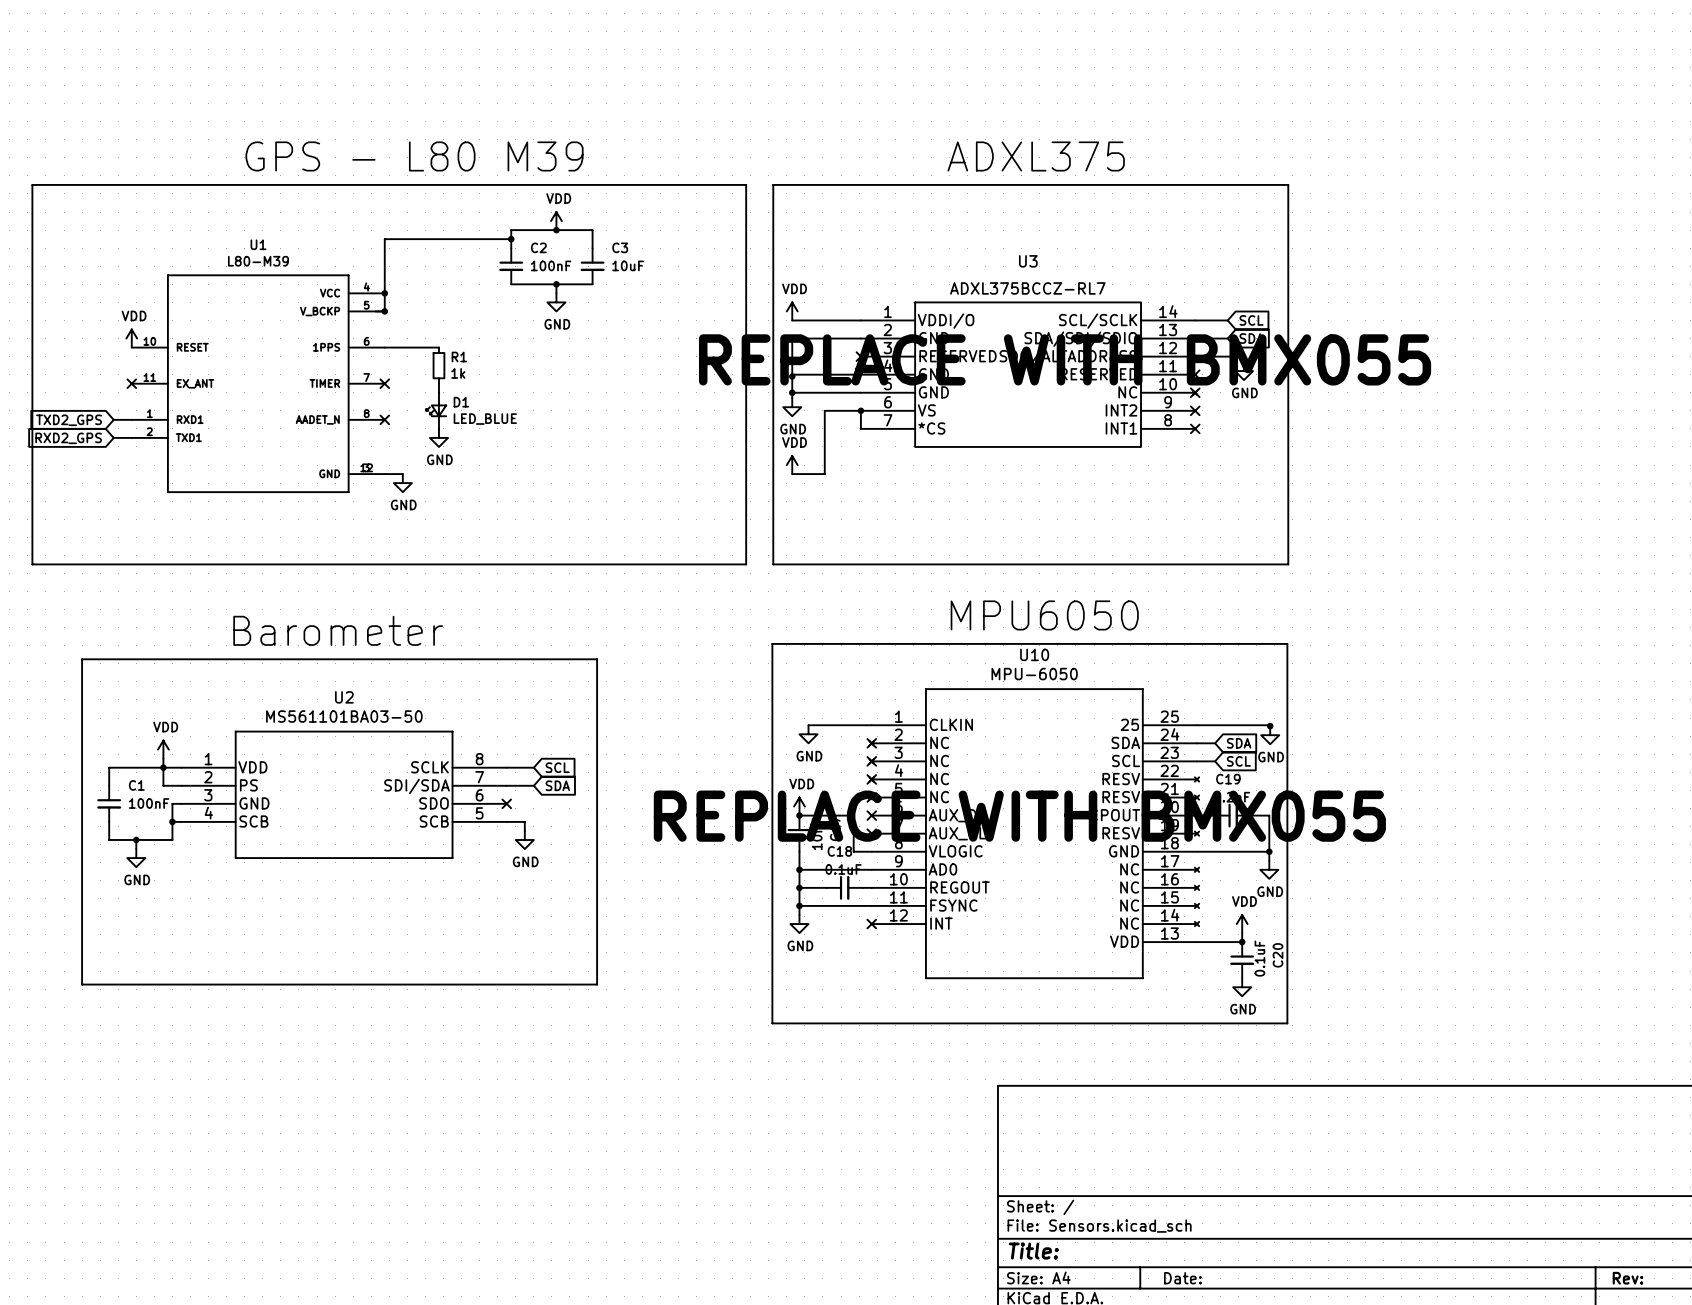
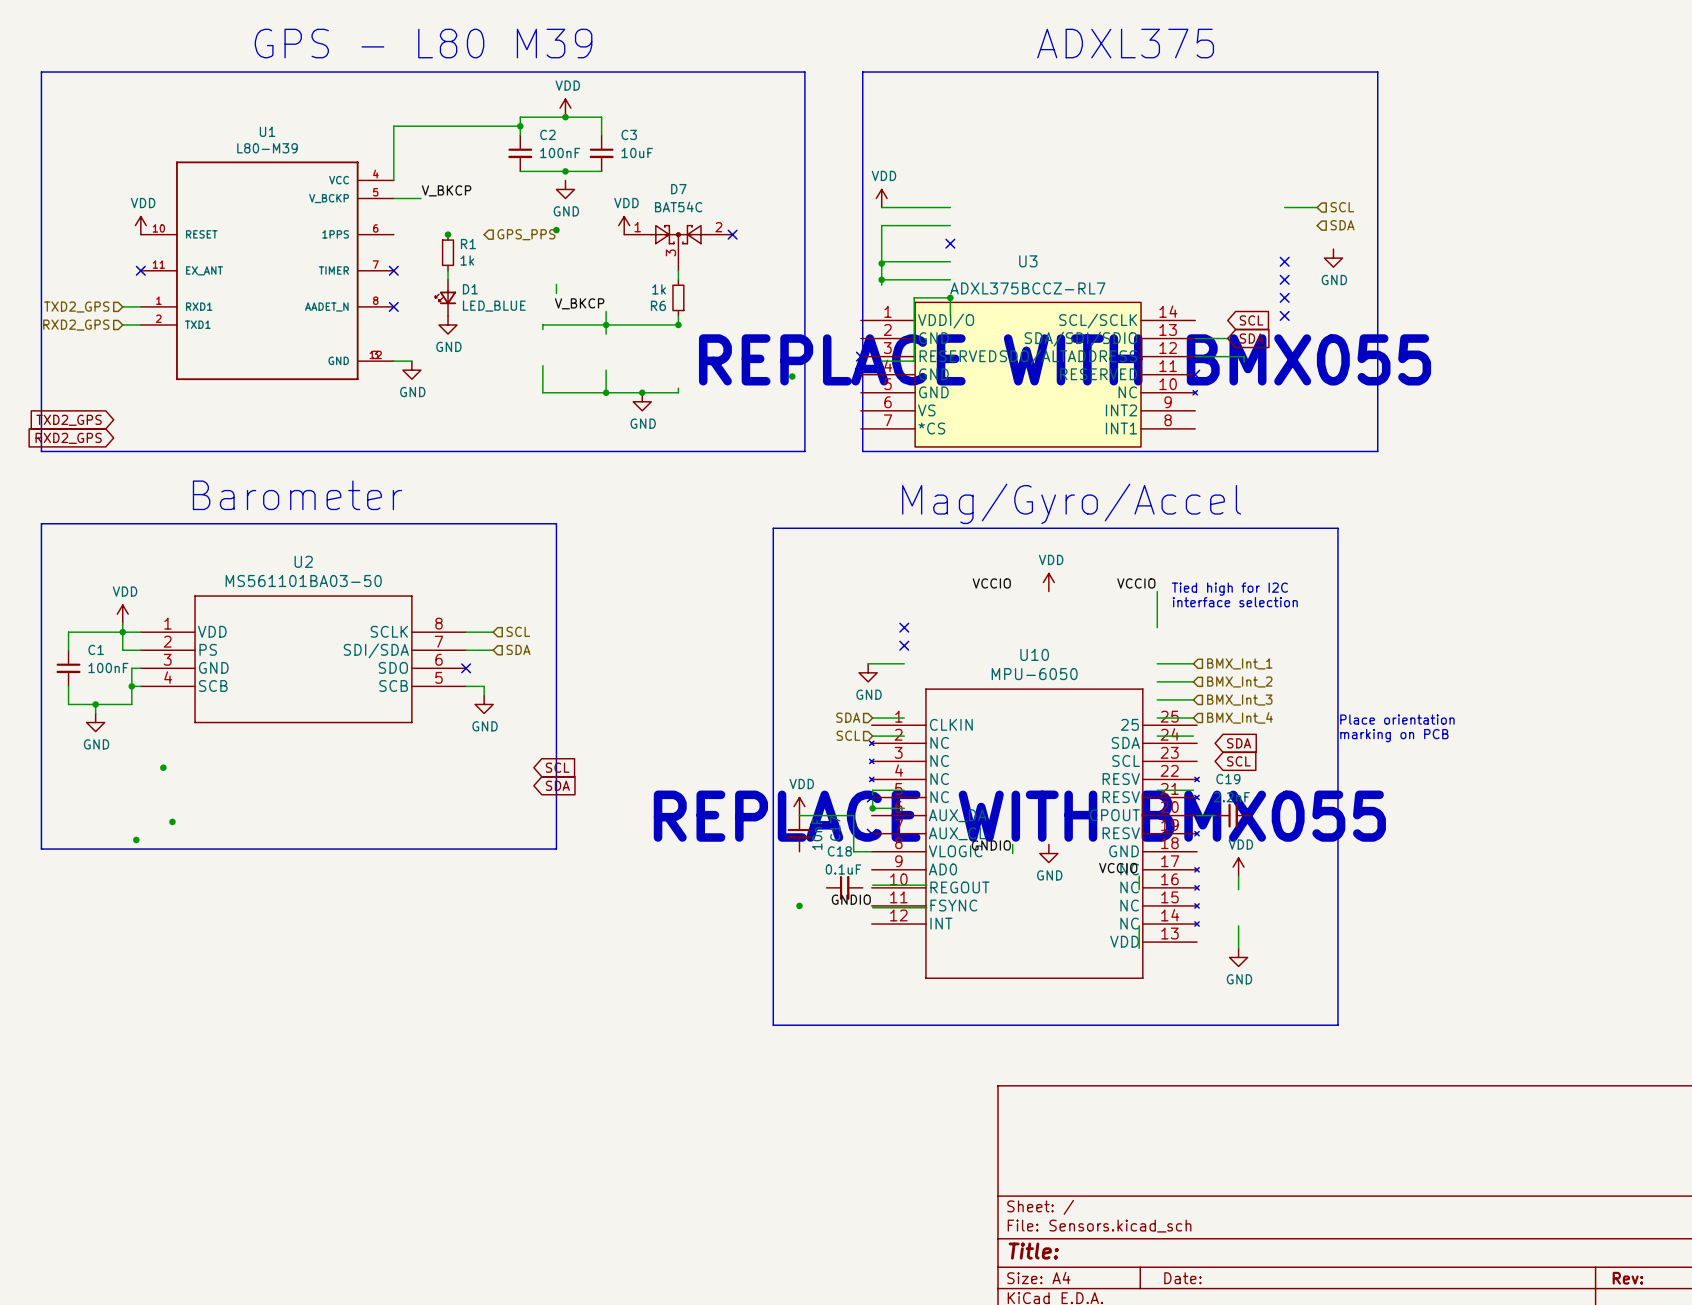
line: none -> (862, 72) (1377, 72) (1377, 451) (862, 451) (862, 72)
power symbol: none -> VDD (565, 108)
junction: none -> (565, 117)
wire: none -> (520, 126) (393, 126) (393, 180)
junction: none -> (520, 126)
text position: GPS - L80 M39 (414, 156) -> GPS - L80 M39 (423, 43)
text position: ADXL375 (1036, 156) -> ADXL375 (1125, 43)
junction: none -> (565, 171)
line: (32, 184) (746, 184) (746, 564) (32, 564) (32, 184) -> (41, 72) (41, 451) (804, 451) (804, 72) (41, 72)
power symbol: none -> GND (565, 189)
label: none -> V_BKCP (446, 190)
wire: none -> (393, 198) (420, 198)
power symbol: none -> VDD (881, 198)
hierarchical label: none -> SCL (1342, 207)
power symbol: VDD (556, 221) -> none
power symbol: none -> VDD (624, 225)
hierarchical label: none -> SDA (1342, 225)
junction: none -> (448, 234)
hierarchical label: none -> GPS_PPS (526, 234)
no-connect mark: none -> (732, 234)
wire: (511, 239) (384, 239) (384, 311) (375, 311) -> none
junction: (511, 239) -> none
no-connect mark: none -> (950, 243)
wire: (511, 248) (511, 230) (592, 230) (592, 248) -> (520, 135) (520, 117) (601, 117) (601, 135)
D7: none -> BAT54C (678, 248)
no-connect mark: none -> (1284, 261)
junction: none -> (881, 263)
C2 position: (511, 266) -> (520, 153)
C3 position: (592, 266) -> (601, 153)
no-connect mark: none -> (140, 270)
no-connect mark: none -> (393, 270)
wire: none -> (678, 270) (678, 279)
junction: none -> (881, 279)
no-connect mark: none -> (1284, 279)
wire: (511, 284) (592, 284) -> (520, 171) (601, 171)
junction: (556, 284) -> none
junction: (384, 293) -> none
R6: none -> 1k (678, 297)
junction: none -> (950, 297)
no-connect mark: none -> (1284, 297)
power symbol: GND (556, 302) -> none
label: none -> V_BKCP (579, 303)
no-connect mark: none -> (393, 306)
hierarchical label: none -> TXD2_GPS (76, 307)
junction: (384, 311) -> none
wire: none -> (606, 311) (606, 334)
power symbol: VDD (792, 311) -> none
wire: none -> (678, 315) (678, 324) (542, 324) (542, 329)
no-connect mark: none -> (1284, 315)
wire: (792, 320) (860, 320) -> (881, 207) (950, 207)
wire: (1195, 320) (1227, 320) -> (1284, 207) (1317, 207)
power symbol: none -> GND (448, 324)
junction: none -> (606, 324)
junction: none -> (678, 324)
hierarchical label: none -> RXD2_GPS (76, 325)
power symbol position: VDD (131, 338) -> VDD (140, 225)
wire: (860, 338) (792, 338) (792, 398) -> (950, 225) (881, 225) (881, 285)
wire: (384, 347) (438, 347) -> none
R1 position: (438, 365) -> (448, 252)
wire: none -> (542, 365) (542, 392) (678, 392) (678, 388)
power symbol: none -> GND (411, 370)
wire: none -> (606, 370) (606, 392)
power symbol position: GND (1244, 371) -> GND (1333, 258)
wire: (860, 374) (794, 374) (792, 376) -> (950, 261) (883, 261) (881, 263)
no-connect mark: (131, 383) -> none
U1 position: (258, 383) -> (267, 270)
no-connect mark: (384, 383) -> none
wire: (438, 383) (438, 392) -> (448, 270) (448, 279)
junction: none -> (606, 392)
junction: none -> (642, 392)
wire: (792, 392) (860, 392) -> (881, 279) (950, 279)
junction: (792, 392) -> none
no-connect mark: (1195, 392) -> none
power symbol: none -> GND (642, 401)
power symbol: GND (792, 407) -> none
D1 position: (436, 410) -> (445, 297)
junction: (860, 410) -> none
no-connect mark: (1195, 410) -> none
wire: (113, 419) (131, 419) -> (122, 306) (140, 306)
no-connect mark: (384, 419) -> none
wire: (860, 428) (860, 410) (824, 410) (824, 474) (792, 474) -> (950, 315) (950, 297) (914, 297) (914, 361) (881, 361)
no-connect mark: (1195, 428) -> none
wire: (113, 437) (131, 437) -> (122, 324) (140, 324)
power symbol: GND (438, 437) -> none
power symbol: VDD (792, 465) -> none
wire: (384, 474) (402, 474) -> (393, 361) (411, 361)
power symbol: GND (402, 483) -> none
text: none -> Mag/Gyro/Accel (1071, 503)
line: (773, 528) (773, 184) (1288, 184) (1288, 564) (773, 564) -> (773, 528) (1337, 528) (1337, 1025) (773, 1025) (773, 564)
power symbol: none -> VDD (1048, 582)
label: none -> VCCIO (991, 583)
label: none -> VCCIO (1136, 583)
text: none -> Tied high for I2C (1229, 589)
wire: none -> (1157, 591) (1157, 627)
text: none -> interface selection (1235, 602)
power symbol: none -> VDD (122, 614)
text: MPU6050 (1044, 615) -> none
no-connect mark: none -> (904, 627)
text position: Barometer (338, 630) -> Barometer (297, 495)
hierarchical label: none -> SCL (518, 631)
junction: none -> (122, 632)
line: (772, 643) (1287, 643) (1287, 1023) (772, 1023) (772, 643) -> none
no-connect mark: none -> (904, 645)
hierarchical label: none -> SDA (518, 649)
line: (82, 659) (597, 659) (597, 984) (82, 984) (82, 659) -> (41, 523) (556, 523) (556, 849) (41, 849) (41, 523)
wire: none -> (868, 663) (904, 663)
wire: none -> (1157, 663) (1193, 663)
hierarchical label: none -> BMX_Int_1 (1239, 663)
no-connect mark: none -> (466, 668)
wire: none -> (1157, 681) (1193, 681)
hierarchical label: none -> BMX_Int_2 (1239, 681)
junction: none -> (131, 686)
wire: none -> (1157, 699) (1193, 699)
hierarchical label: none -> BMX_Int_3 (1239, 700)
junction: none -> (95, 704)
power symbol: none -> GND (484, 704)
hierarchical label: none -> SDA (848, 717)
hierarchical label: none -> BMX_Int_4 (1240, 717)
wire: none -> (872, 718) (904, 718)
wire: none -> (1157, 718) (1193, 718)
text: none -> Place orientation (1397, 719)
wire: (808, 725) (871, 725) -> none
wire: (1197, 725) (1270, 726) -> none
junction: (1270, 726) -> none
power symbol position: GND (808, 734) -> GND (868, 672)
hierarchical label: none -> SCL (848, 735)
power symbol: GND (1270, 735) -> none
text: none -> marking on PCB (1394, 735)
wire: none -> (872, 736) (904, 736)
wire: none -> (1157, 736) (1193, 736)
no-connect mark: (871, 743) -> none
wire: (1197, 743) (1215, 743) -> none
power symbol: VDD (163, 749) -> none
wire: (163, 758) (163, 785) (181, 785) -> (122, 623) (122, 650) (140, 650)
no-connect mark: (871, 761) -> none
wire: (1197, 761) (1215, 761) -> none
wire: (181, 767) (109, 767) (109, 785) -> (140, 632) (68, 632) (68, 650)
wire: (506, 767) (533, 767) -> (466, 632) (493, 632)
no-connect mark: (871, 779) -> none
wire: (506, 785) (533, 785) -> (466, 650) (493, 650)
wire: none -> (904, 790) (872, 790) (872, 808) (904, 808)
wire: none -> (1157, 790) (1193, 790)
U2 position: (344, 794) -> (303, 659)
C1 position: (109, 803) -> (68, 668)
wire: (181, 803) (172, 803) (172, 839) (109, 839) (109, 821) -> (140, 668) (131, 668) (131, 704) (68, 704) (68, 686)
no-connect mark: (506, 803) -> none
junction: none -> (872, 808)
junction: (799, 815) -> none
no-connect mark: (871, 815) -> none
wire: (1251, 815) (1269, 815) (1269, 860) -> none
wire: (172, 821) (181, 821) -> (131, 686) (140, 686)
wire: (506, 821) (524, 821) (524, 830) -> (466, 686) (484, 686) (484, 695)
power symbol: GND (524, 839) -> none
wire: none -> (1012, 844) (1012, 853)
label: none -> GNDIO (991, 845)
wire: (799, 851) (799, 914) -> none
wire: (1197, 851) (1269, 851) -> none
junction: (1269, 851) -> none
power symbol: none -> GND (1048, 853)
power symbol position: GND (136, 858) -> GND (95, 722)
label: none -> VCCIO (1118, 868)
wire: (799, 869) (871, 869) -> none
junction: (799, 869) -> none
power symbol: GND (1269, 869) -> none
wire: none -> (1139, 876) (1139, 889)
wire: none -> (1238, 876) (1238, 889)
wire: none -> (872, 885) (926, 885)
wire: (799, 887) (826, 887) -> none
junction: (799, 887) -> none
wire: (862, 887) (871, 887) -> none
label: none -> GNDIO (851, 899)
wire: (799, 905) (871, 905) -> none
wire: none -> (872, 907) (926, 907)
power symbol: GND (799, 924) -> none
no-connect mark: (871, 924) -> none
power symbol position: VDD (1242, 924) -> VDD (1238, 867)
wire: none -> (1139, 925) (1139, 948)
wire: none -> (1238, 925) (1238, 948)
wire: (1242, 933) (1242, 942) (1197, 942) -> none
junction: (1242, 942) -> none
C20: 0.1uF (1242, 960) -> none
power symbol position: GND (1242, 987) -> GND (1238, 957)

